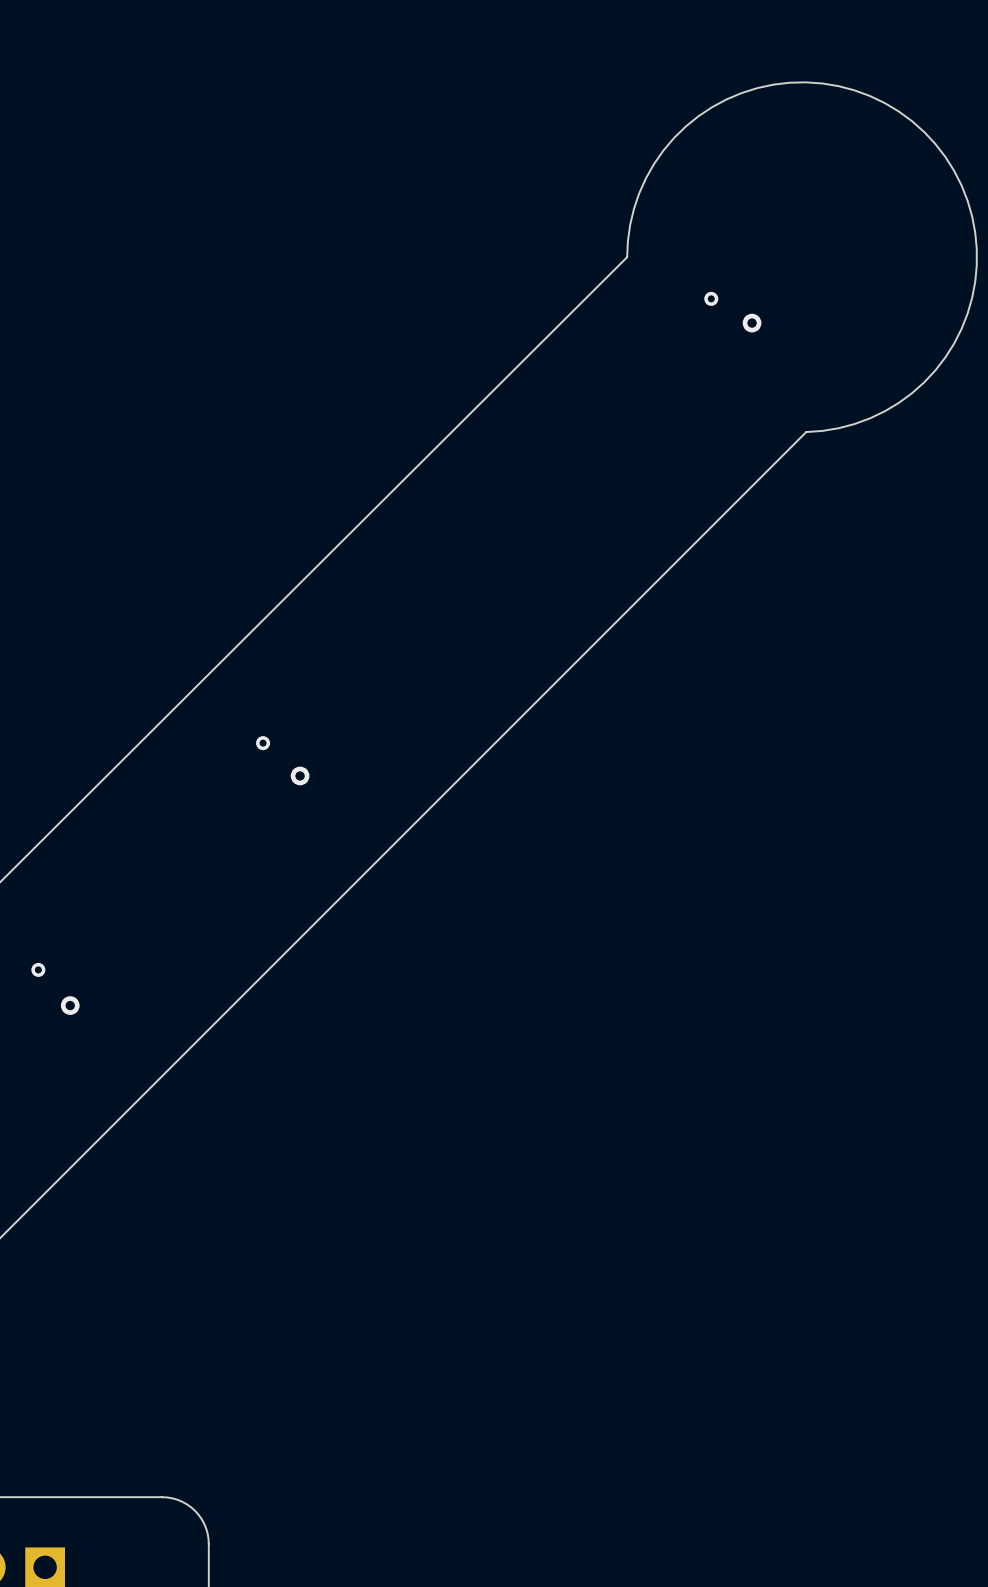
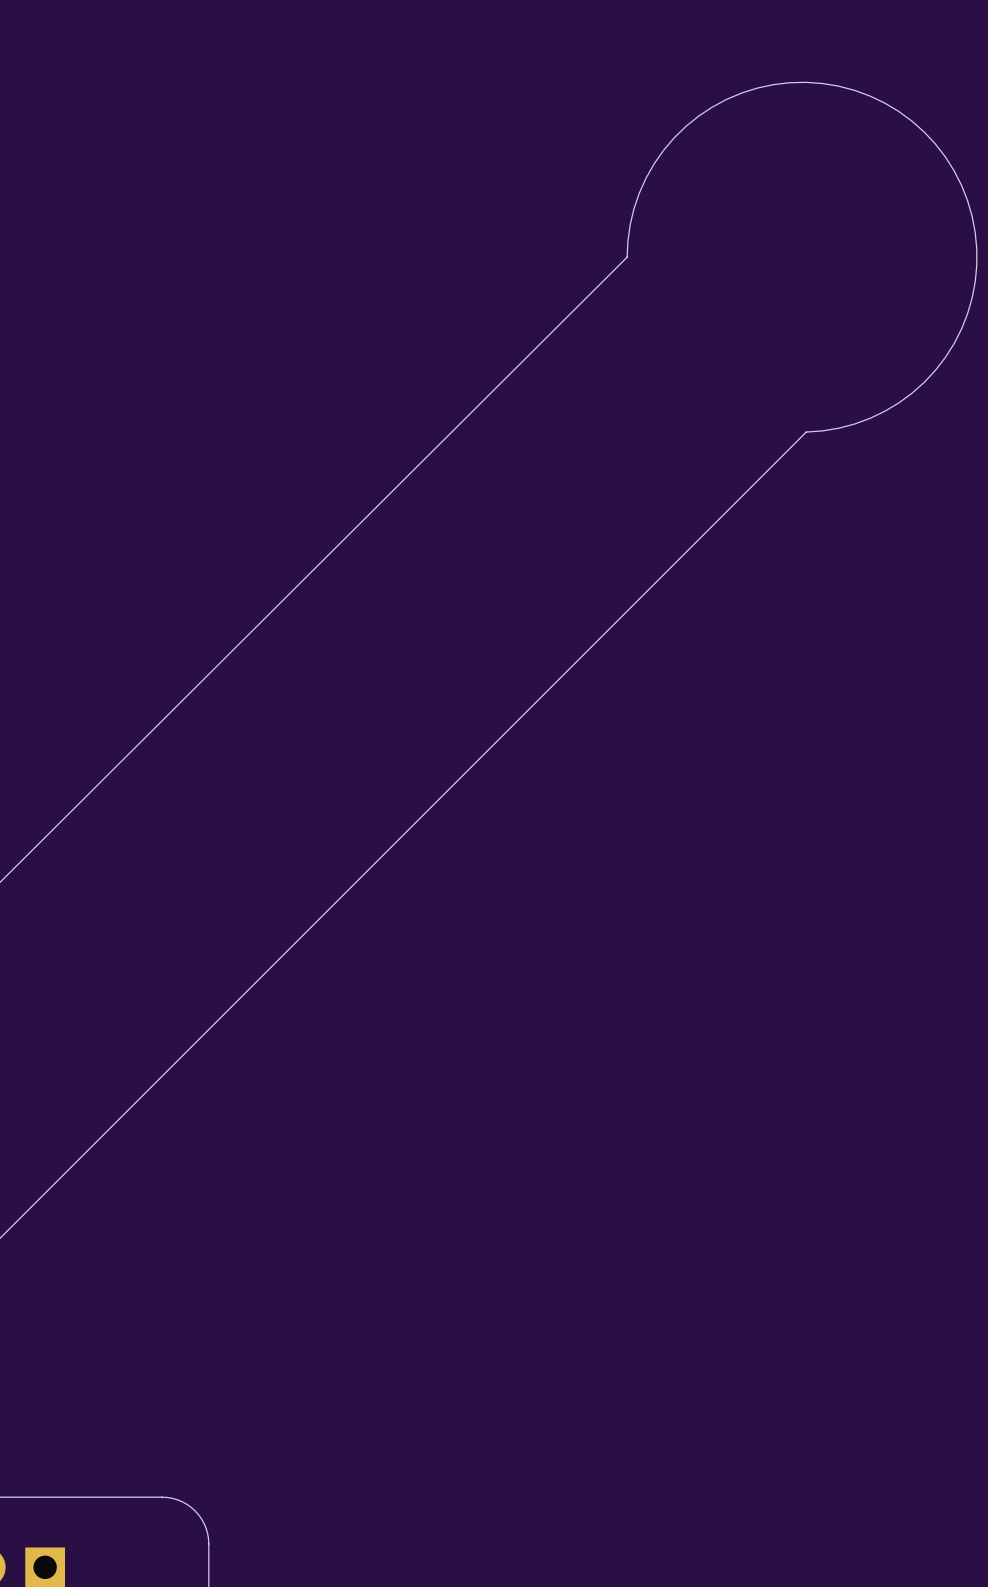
via: (711, 298) -> none
via: (752, 323) -> none
via: (263, 743) -> none
via: (300, 775) -> none
via: (38, 969) -> none
via: (70, 1005) -> none

